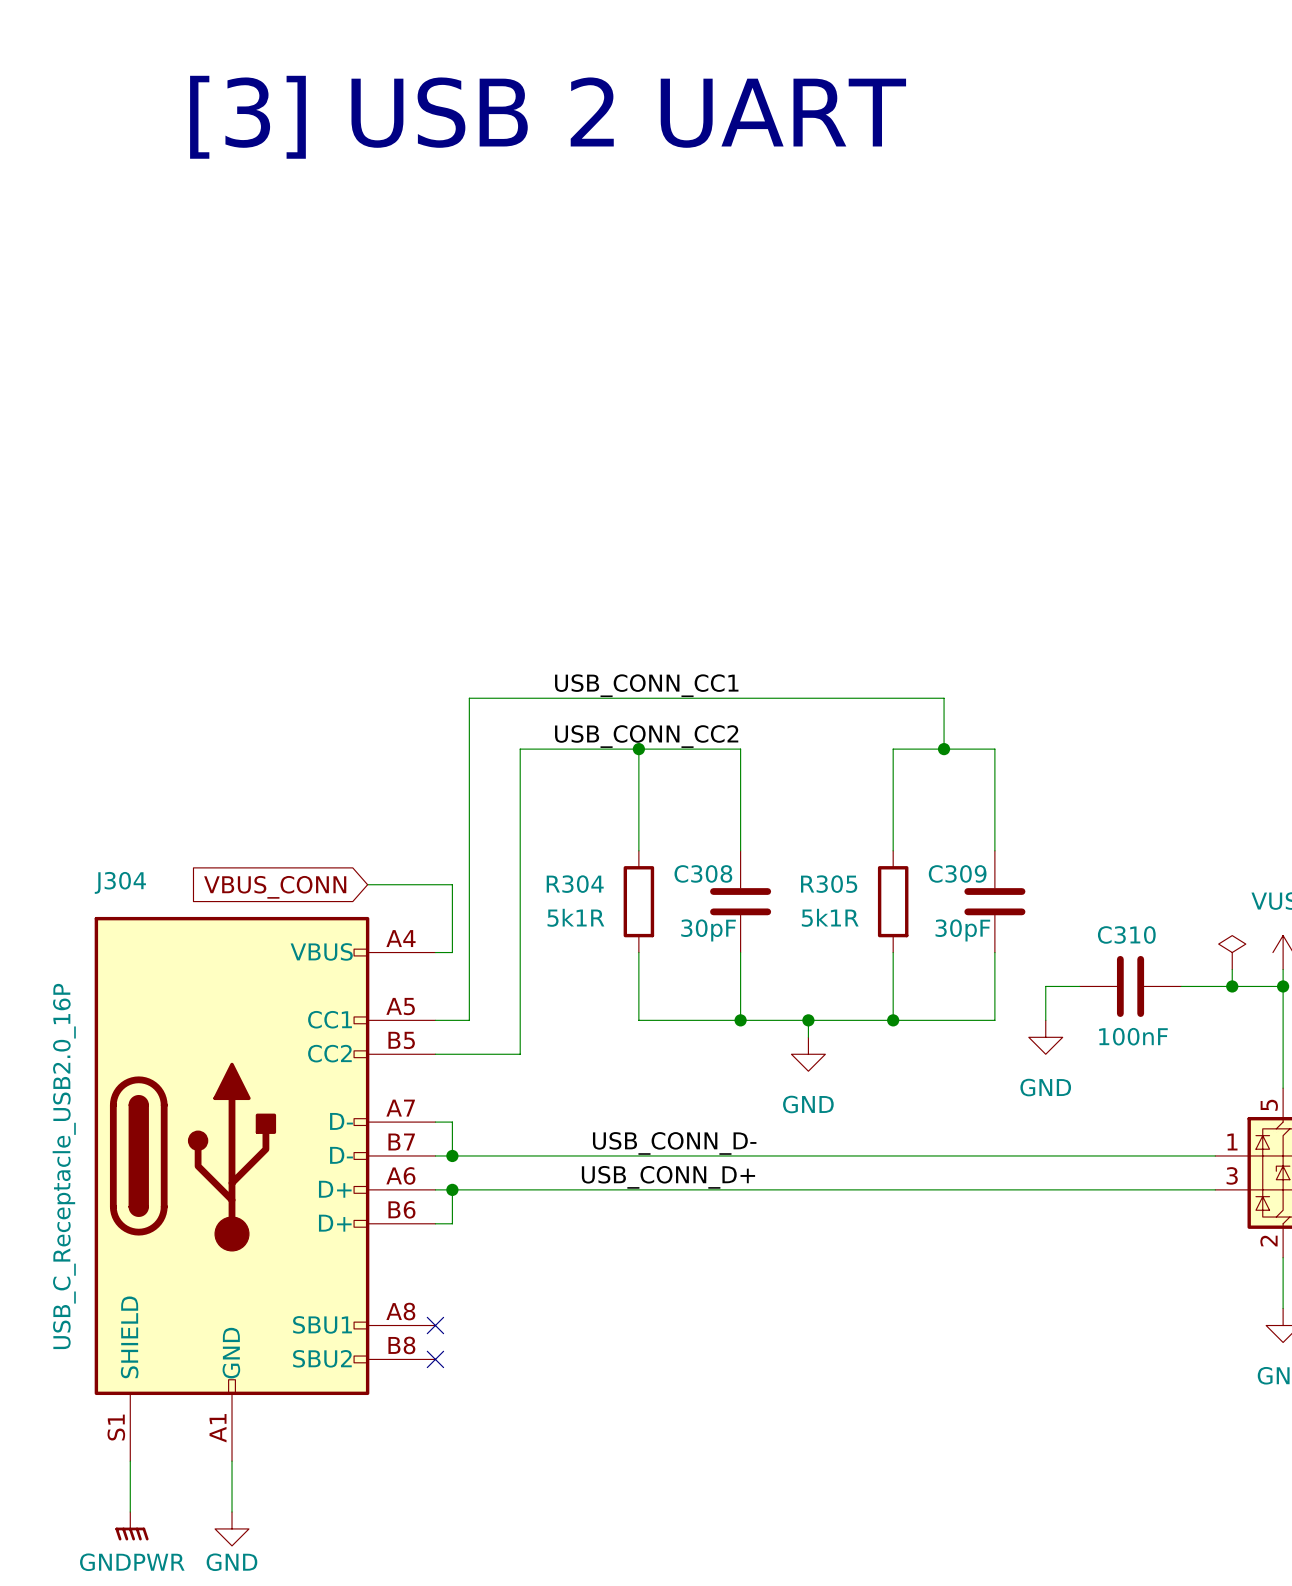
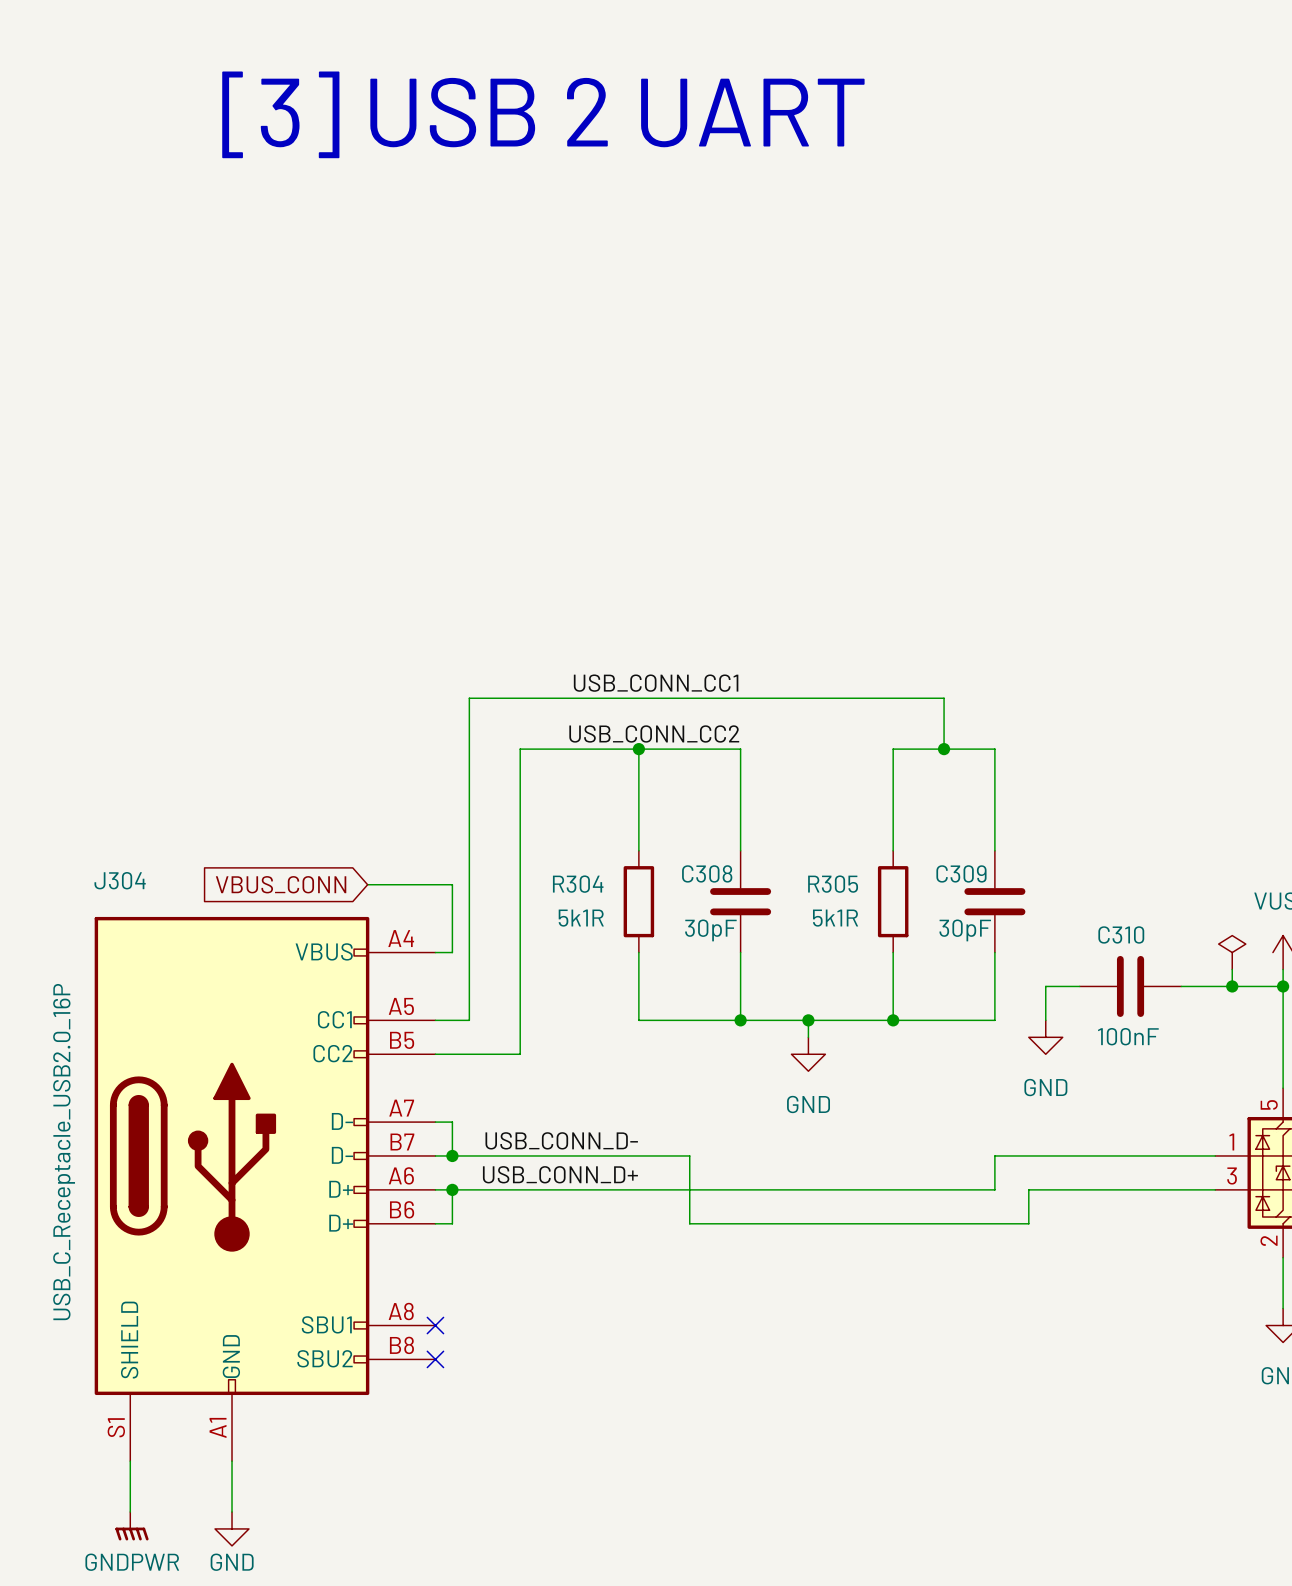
label position: USB_CONN_D- (674, 1143) -> USB_CONN_D- (561, 1140)
wire: (689, 1155) (994, 1155) -> (689, 1155) (689, 1223) (1028, 1223) (1028, 1189)
label position: USB_CONN_D+ (668, 1177) -> USB_CONN_D+ (560, 1174)
wire: (994, 1189) (1028, 1189) -> (994, 1189) (994, 1155)

